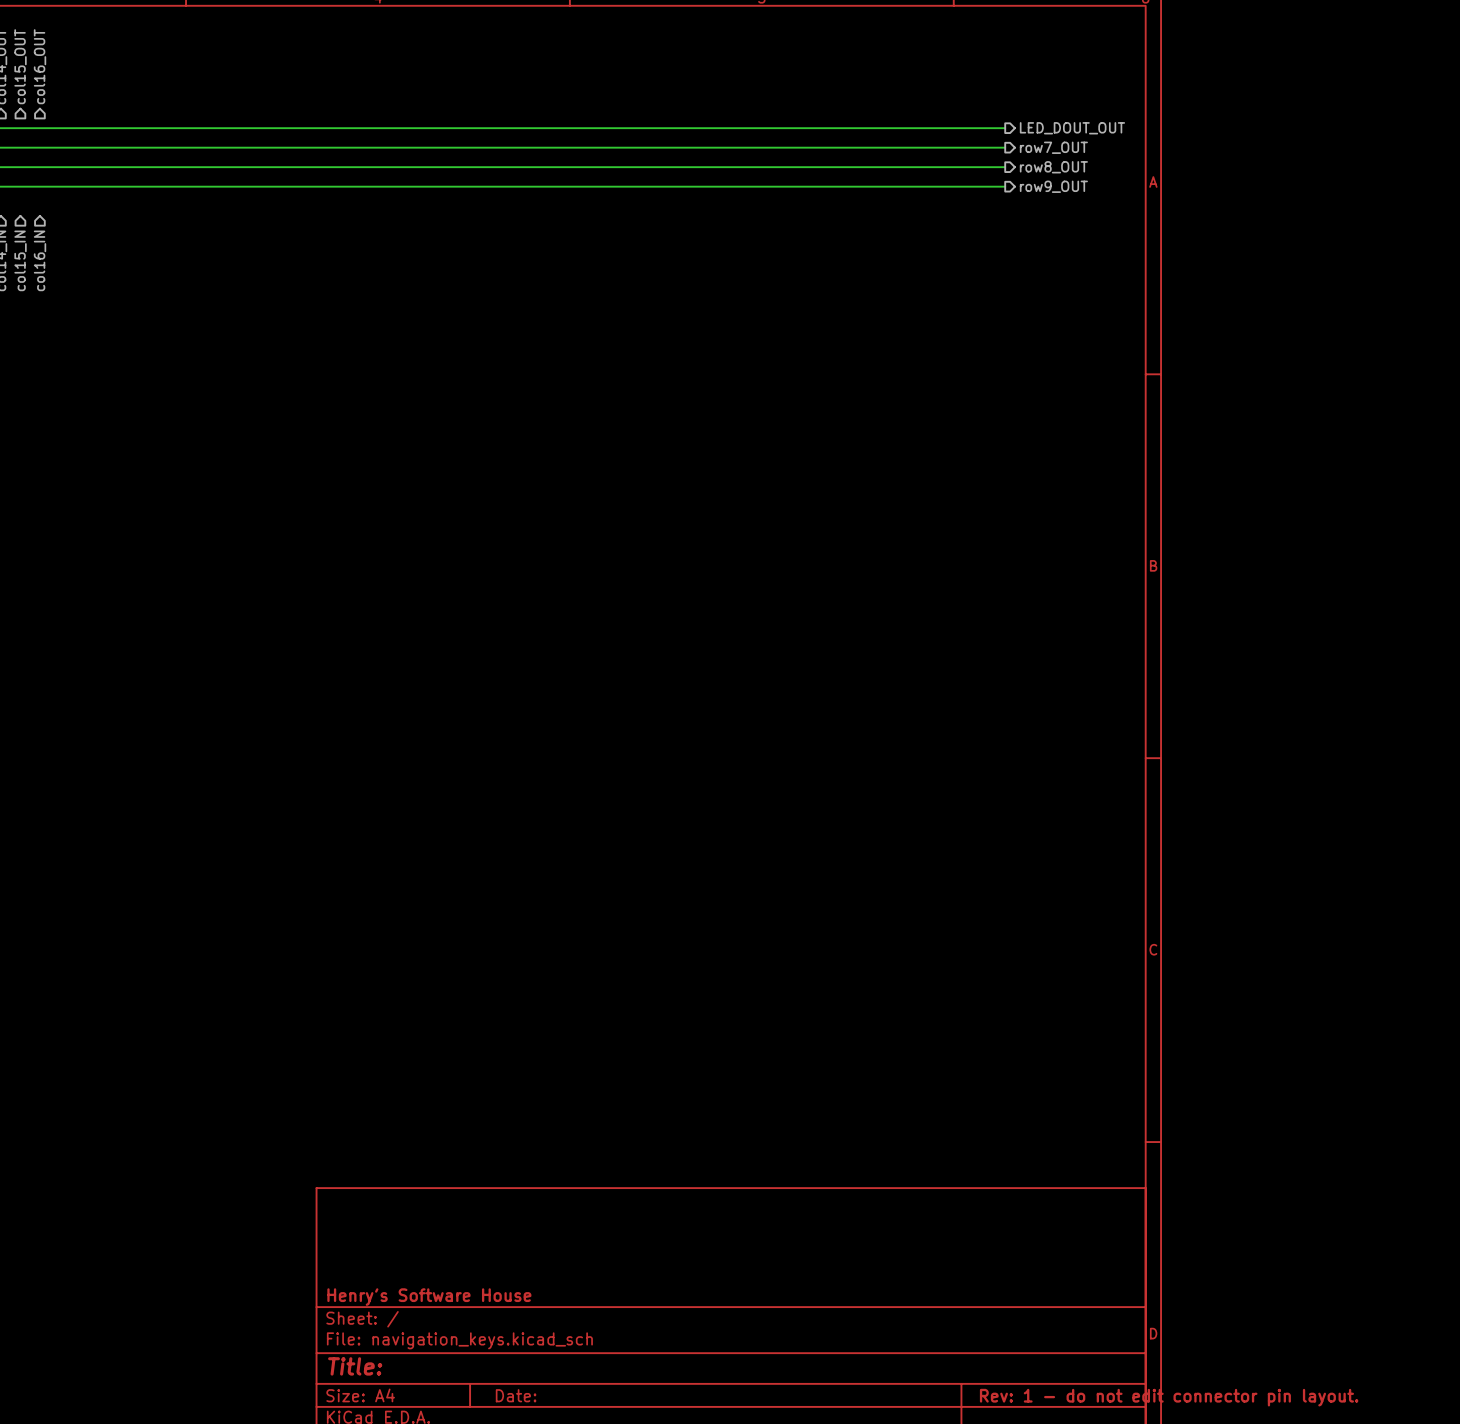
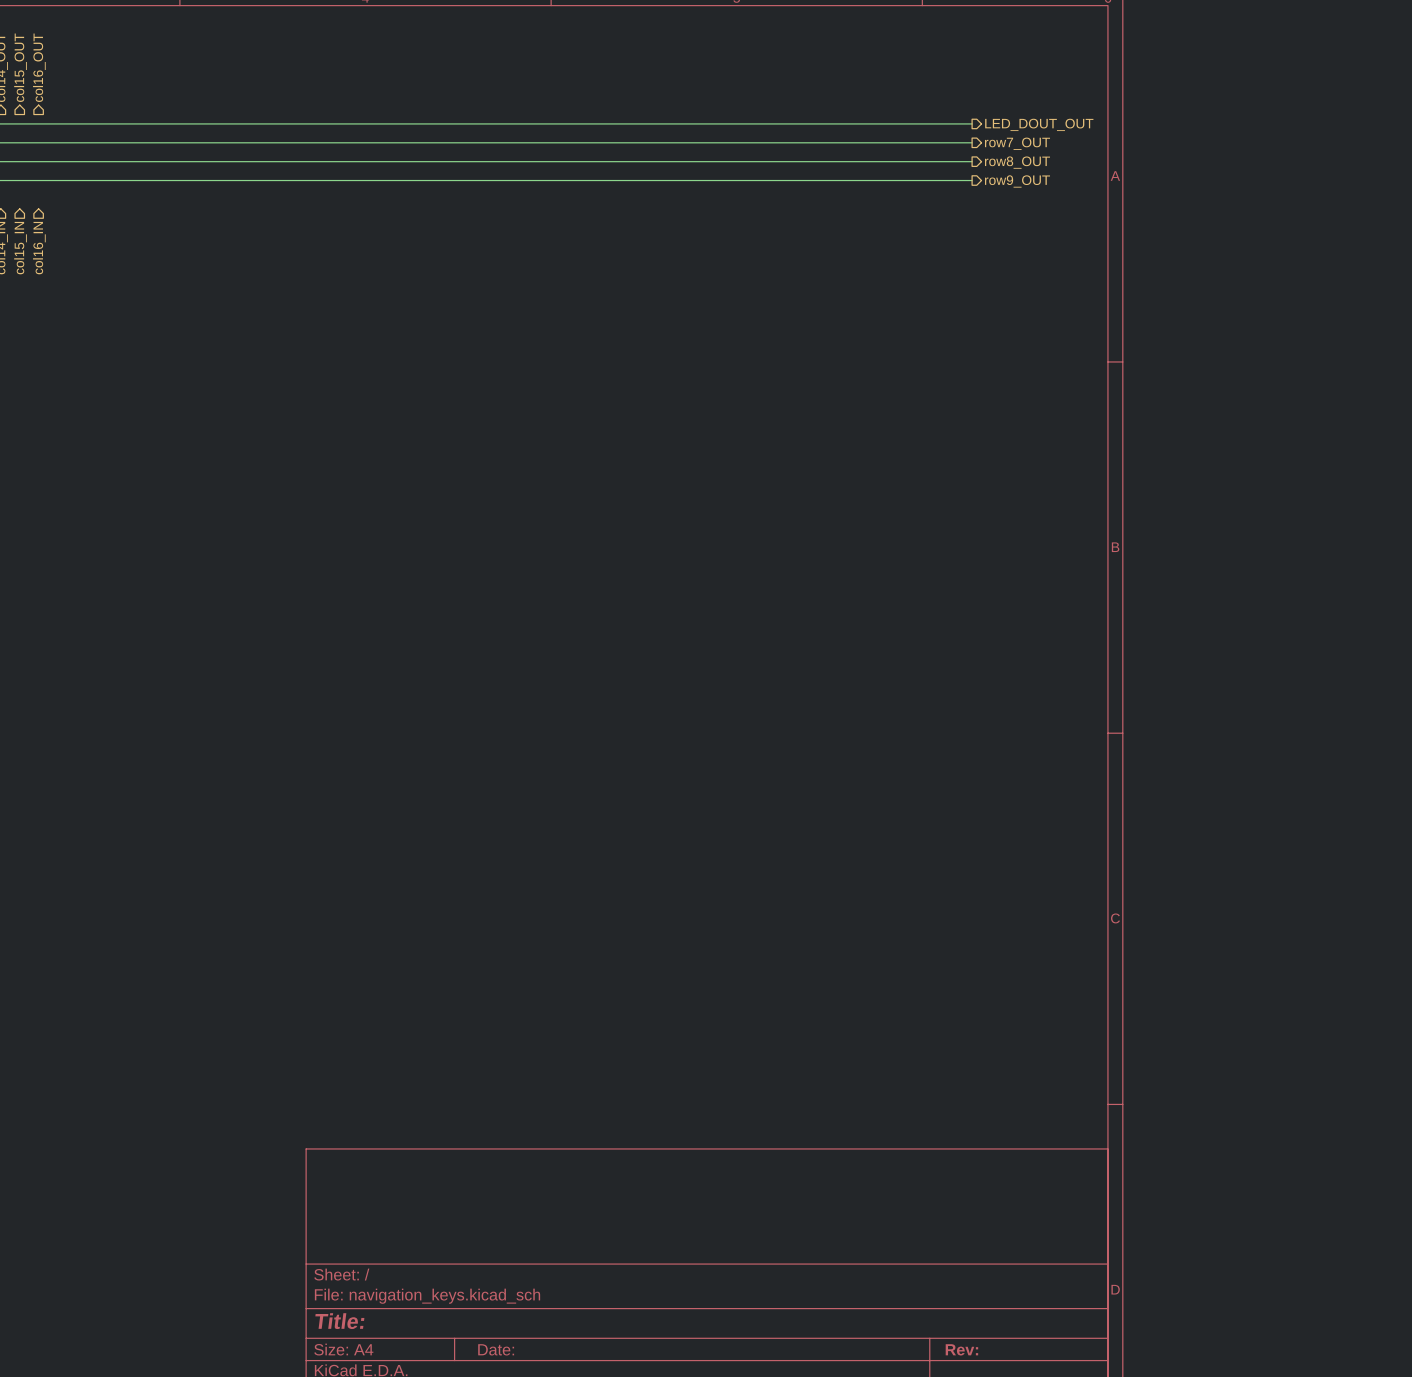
title block: Henry's Software House (429, 1297) -> none
title block: Rev: 1 - do not edit connector pin layout. (1169, 1397) -> Rev: (961, 1349)

